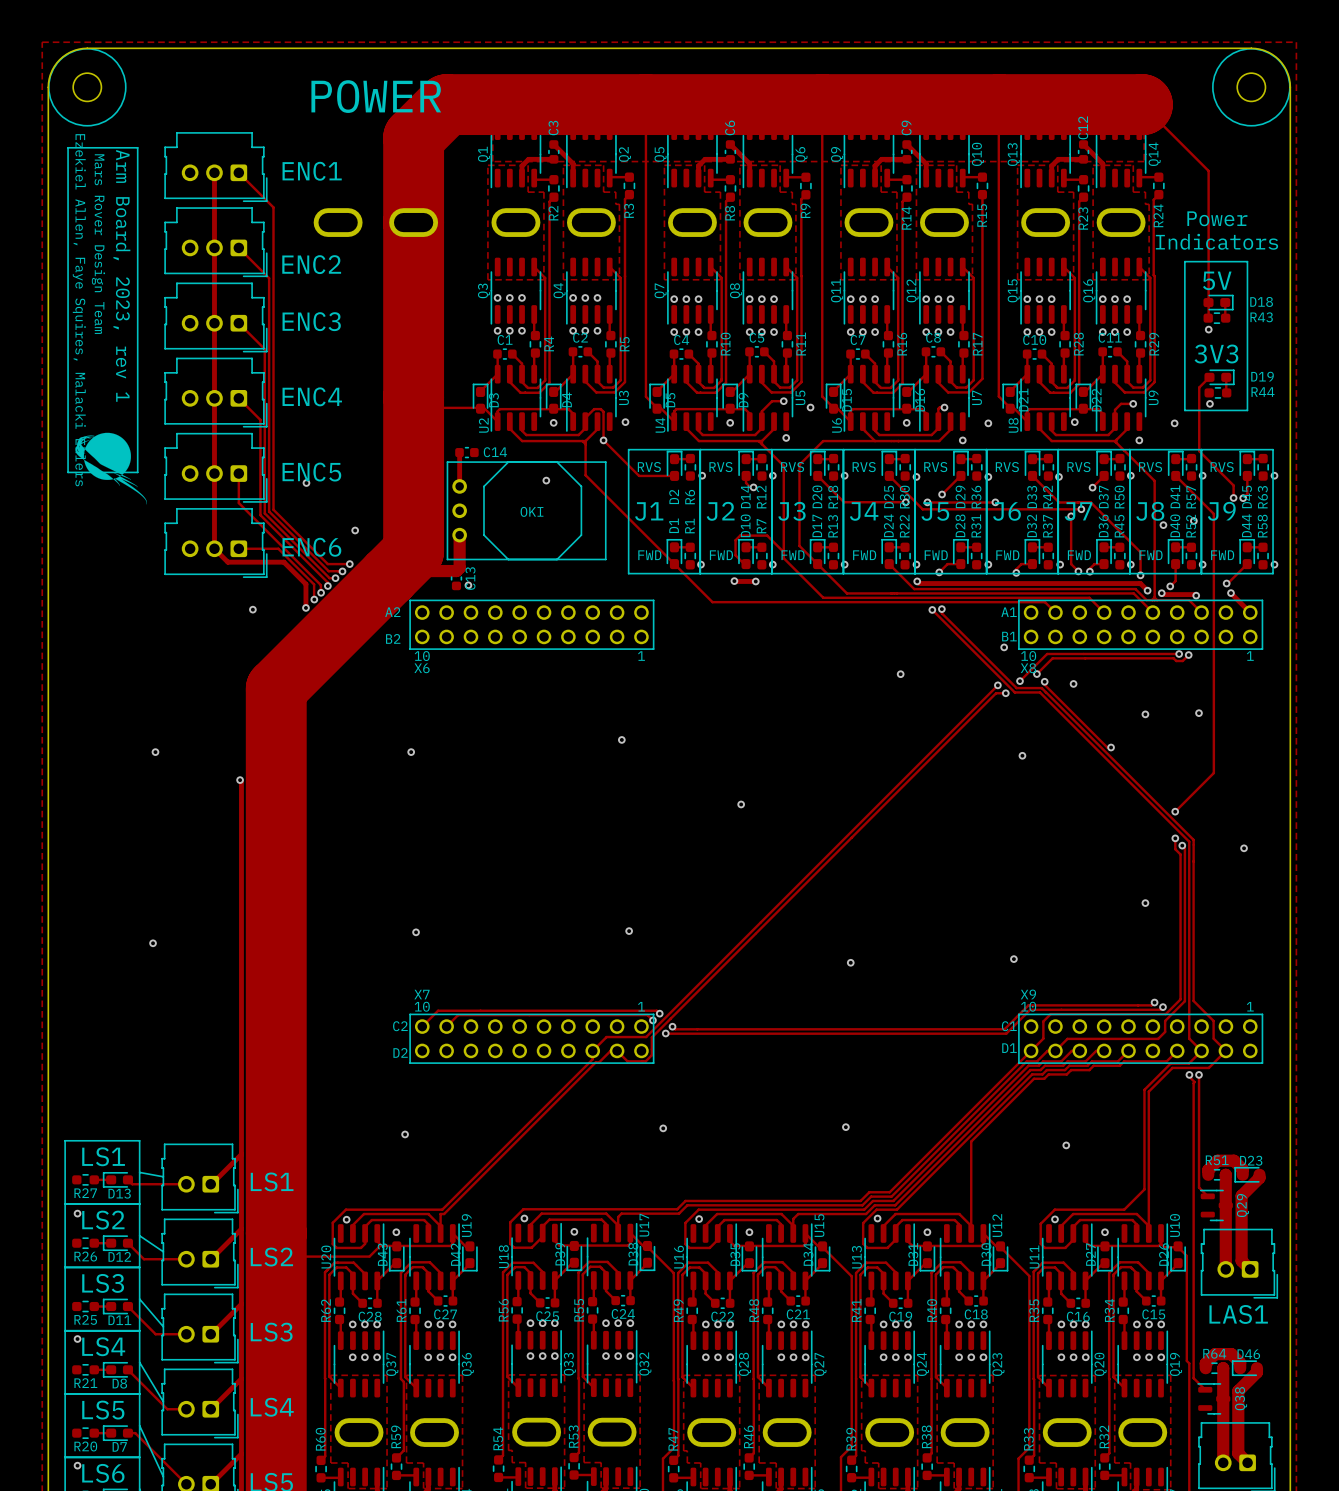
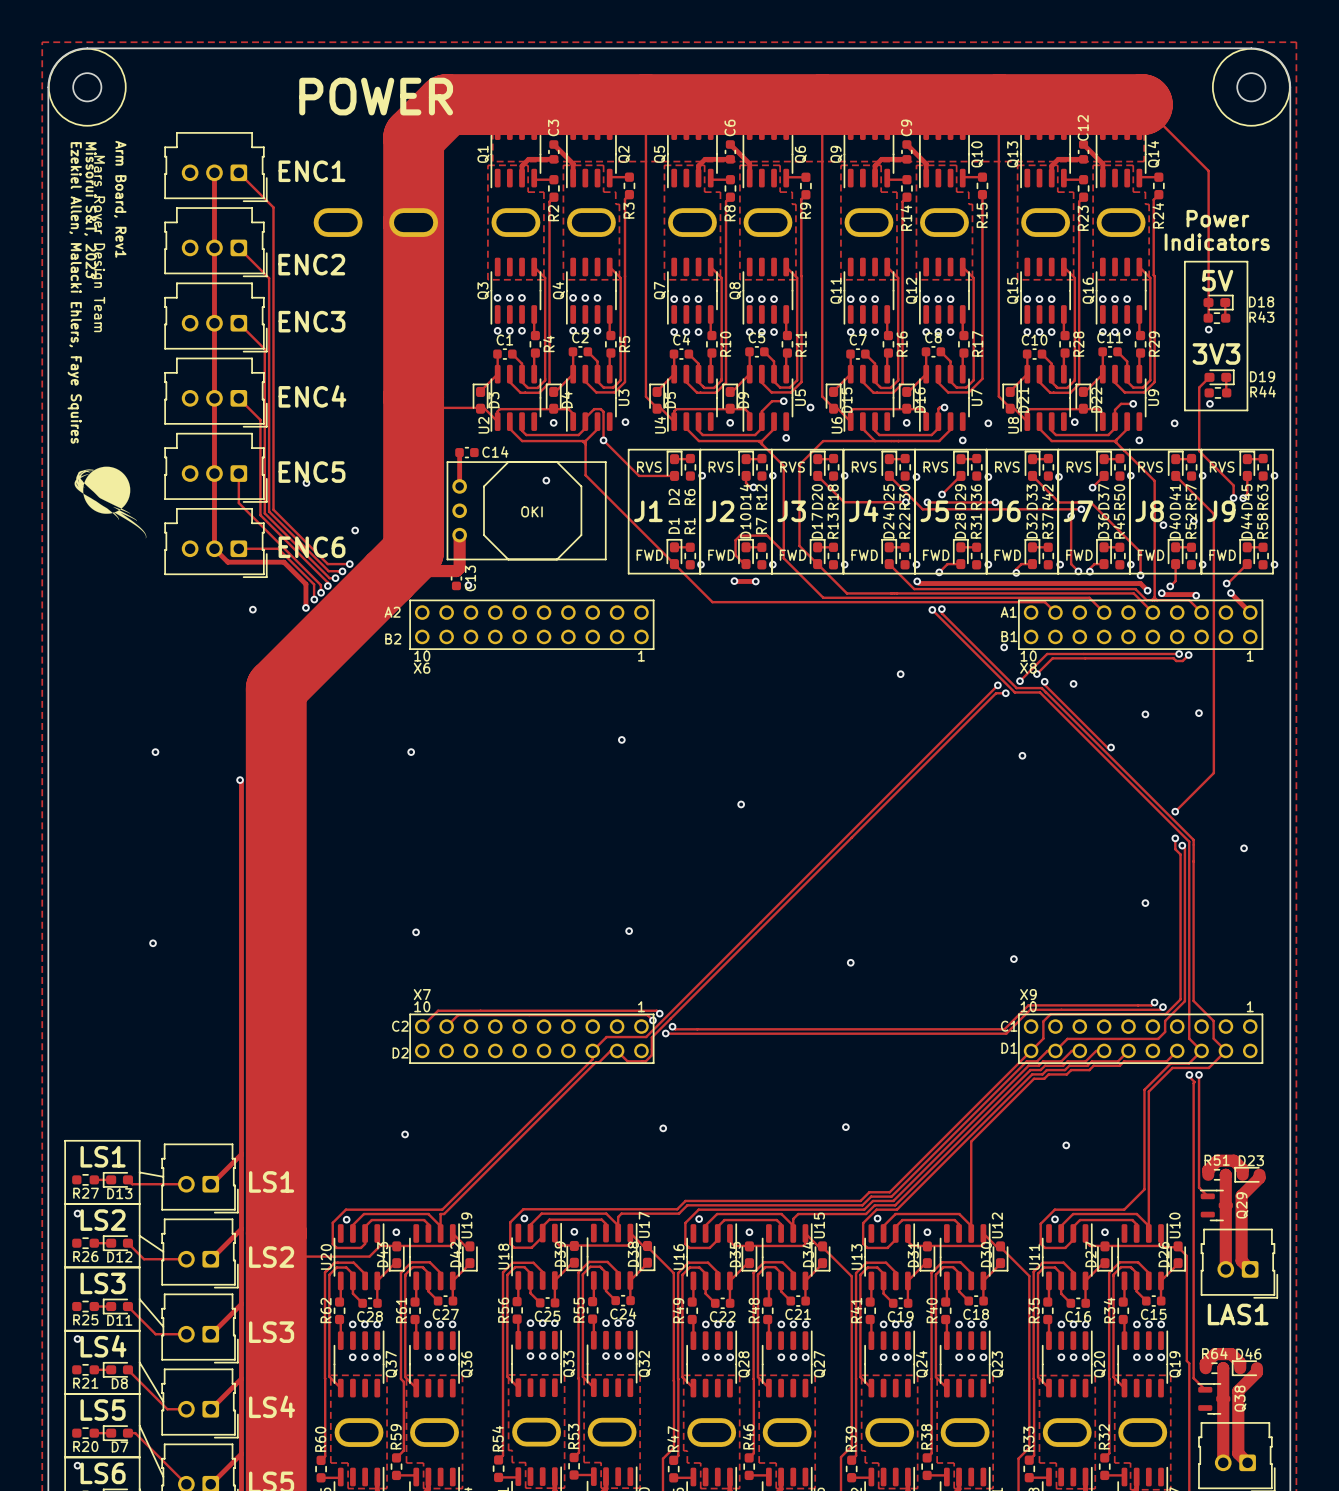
line: (68, 147) (137, 147) (137, 472) (68, 472) (68, 147) -> none
text: none -> Missorui S&T, 2023 (90, 210)
text: Arm Board, 2023, rev 1 (121, 275) -> Arm Board, Rev1 (120, 199)
text: Ezekiel Allen, Faye Squires, Malacki Ehlers (79, 310) -> Ezekiel Allen, Malacki Ehlers, Faye Squires (74, 292)
drawing position: (111, 468) -> (110, 502)

